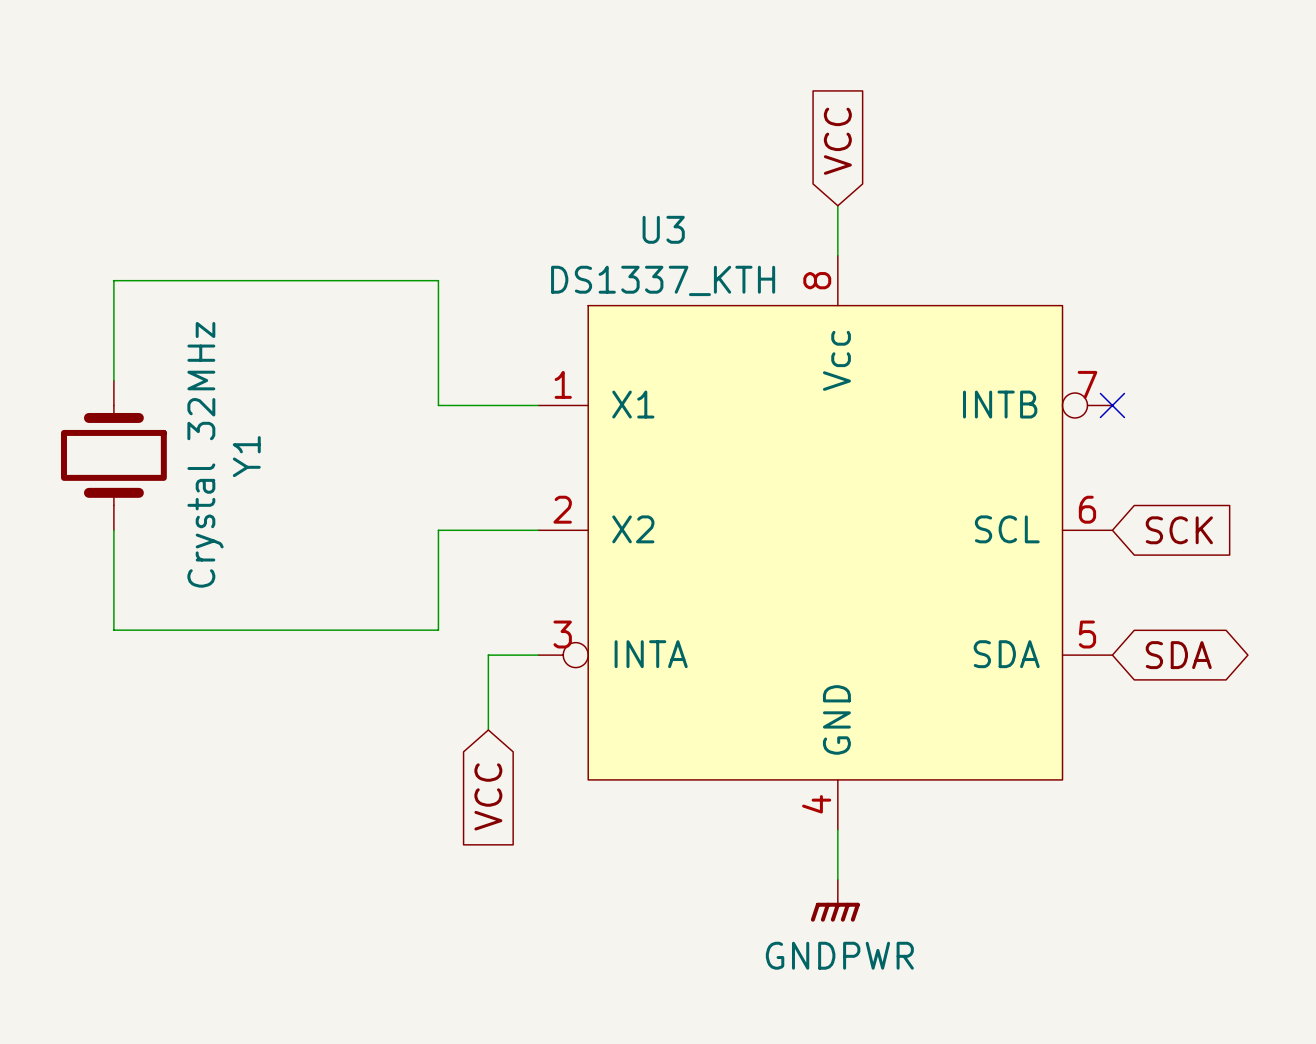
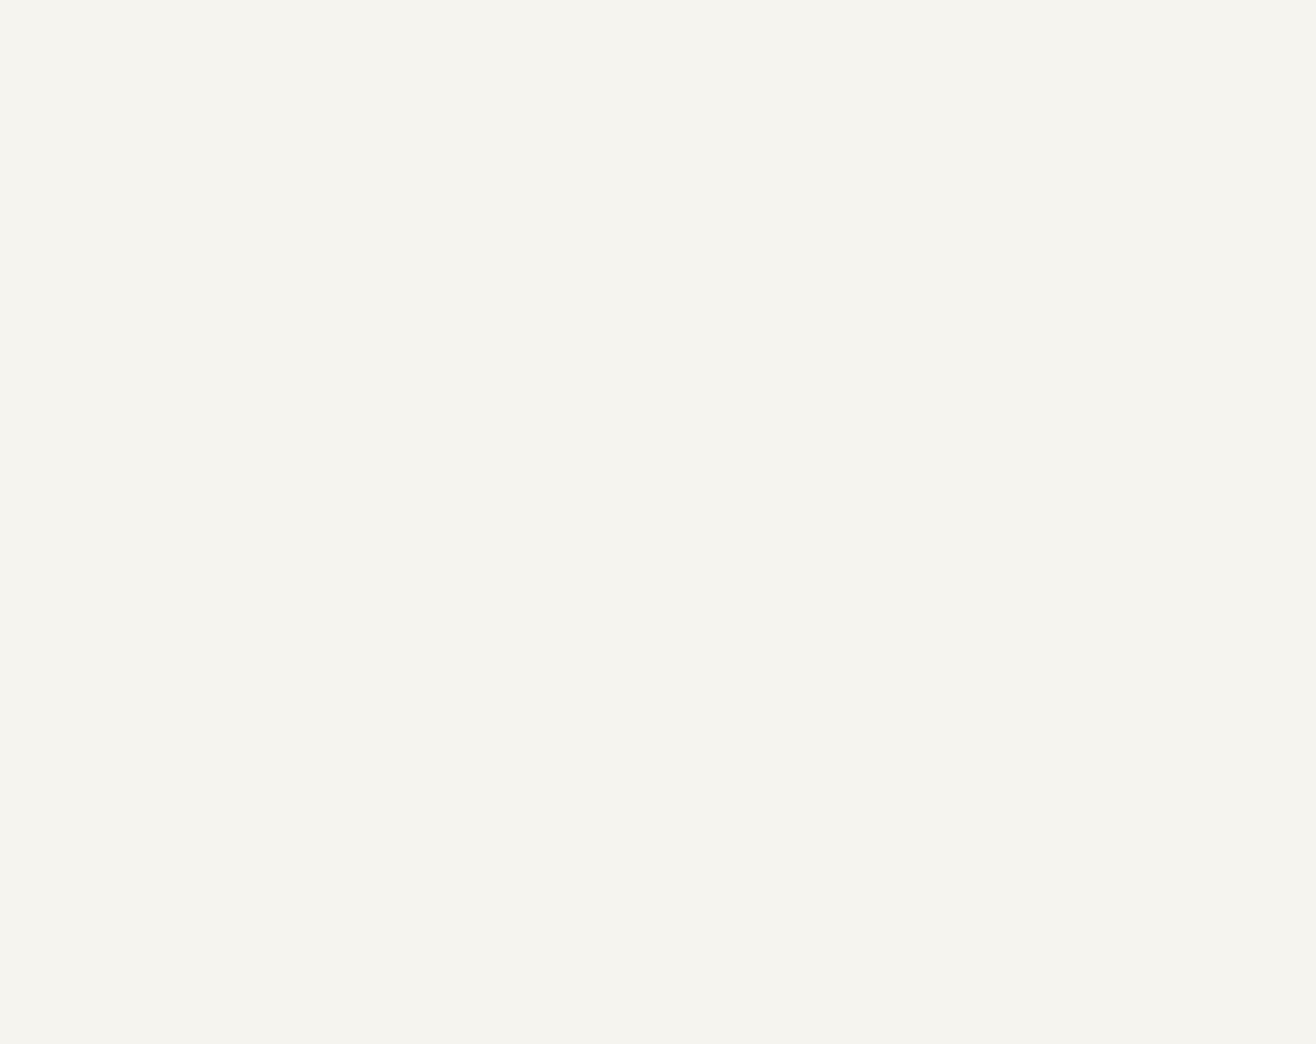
global label: VCC (837, 141) -> none
wire: (837, 205) (837, 255) -> none
wire: (113, 380) (113, 280) (438, 280) (438, 405) (538, 405) -> none
no-connect mark: (1112, 405) -> none
Y1: Crystal 32MHz (113, 455) -> none
wire: (113, 530) (113, 630) (438, 630) (438, 530) (538, 530) -> none
global label: SCK (1179, 530) -> none
U3: DS1337_KTH (825, 542) -> none
wire: (538, 655) (488, 655) (488, 730) -> none
global label: SDA (1178, 655) -> none
global label: VCC (488, 796) -> none
wire: (837, 829) (837, 879) -> none
power symbol: GNDPWR (835, 900) -> none

